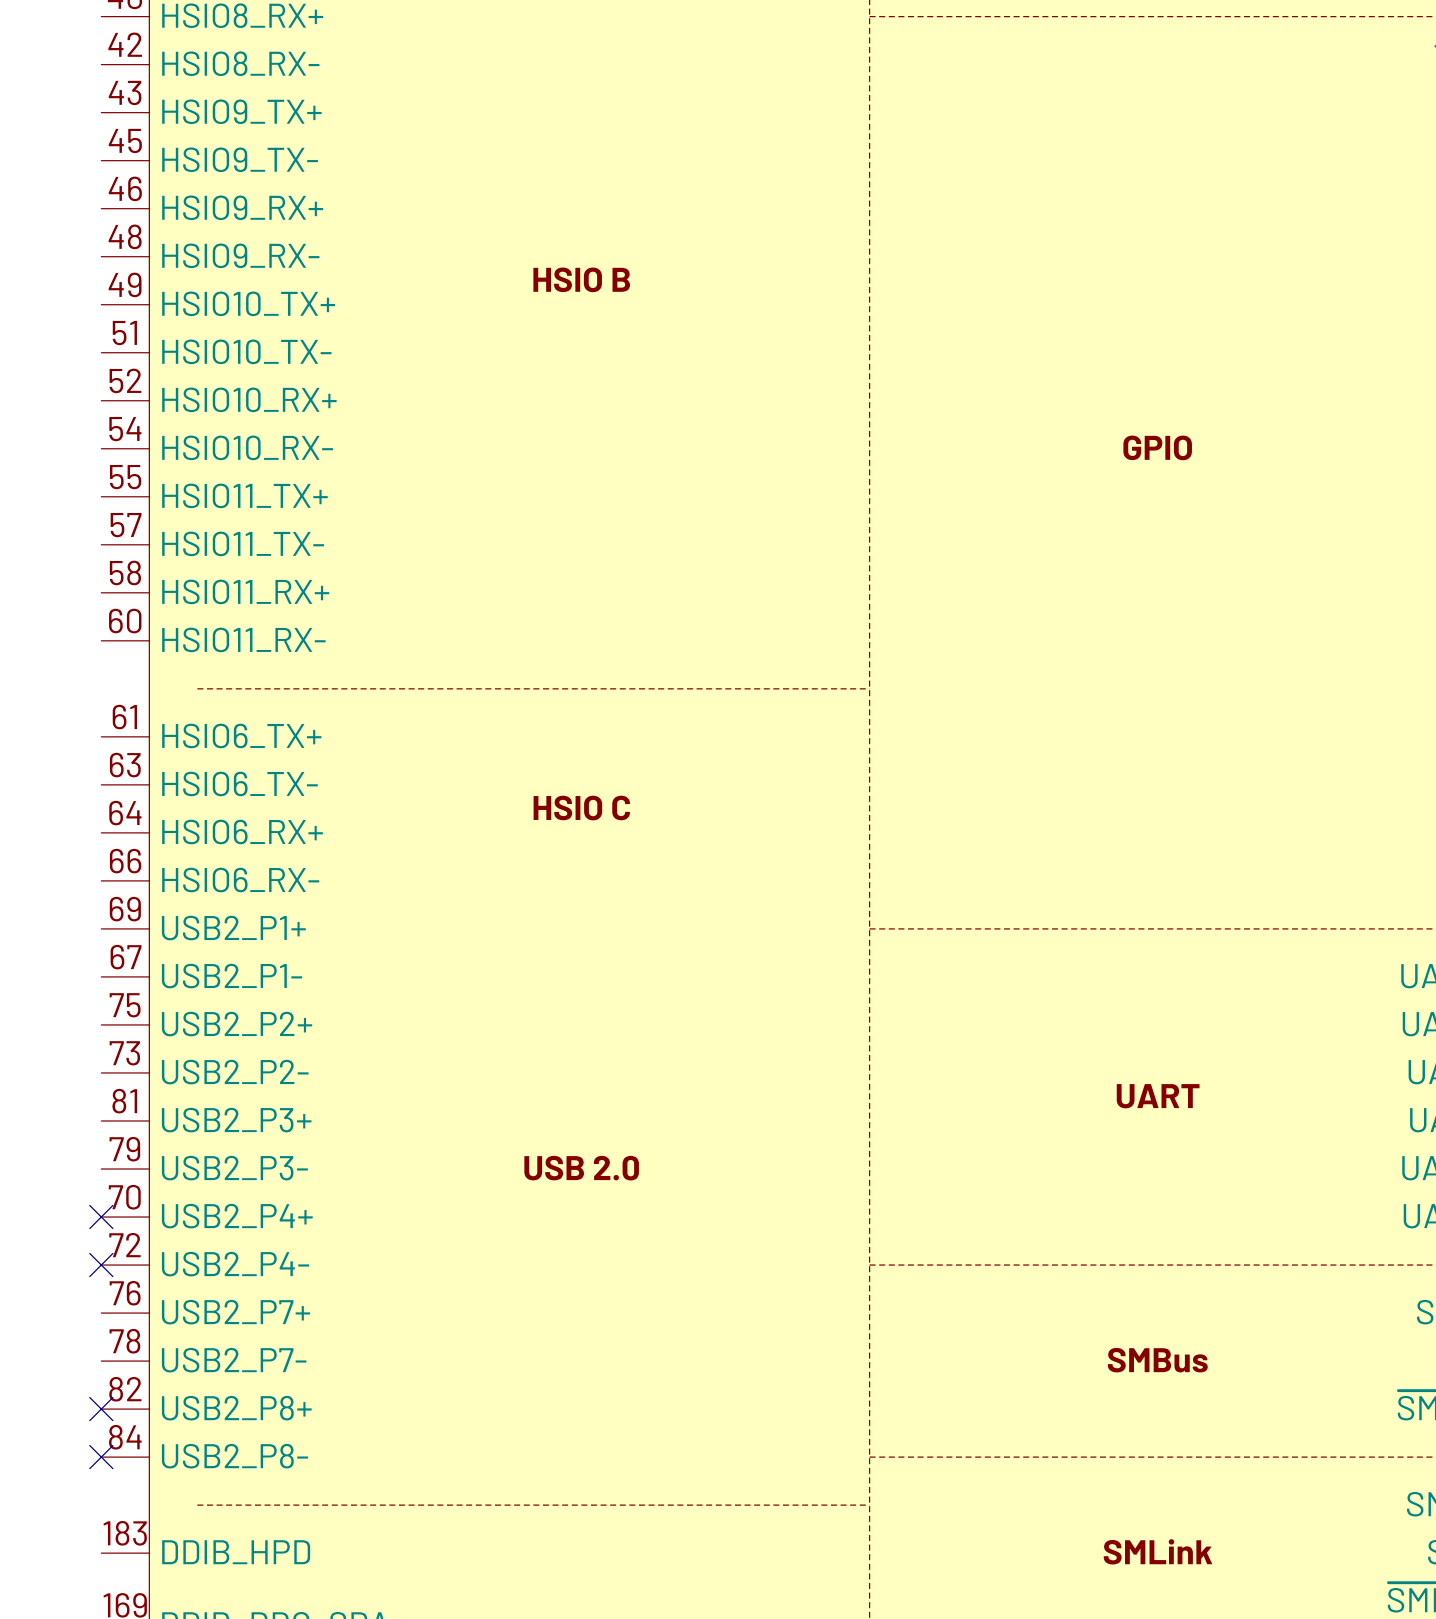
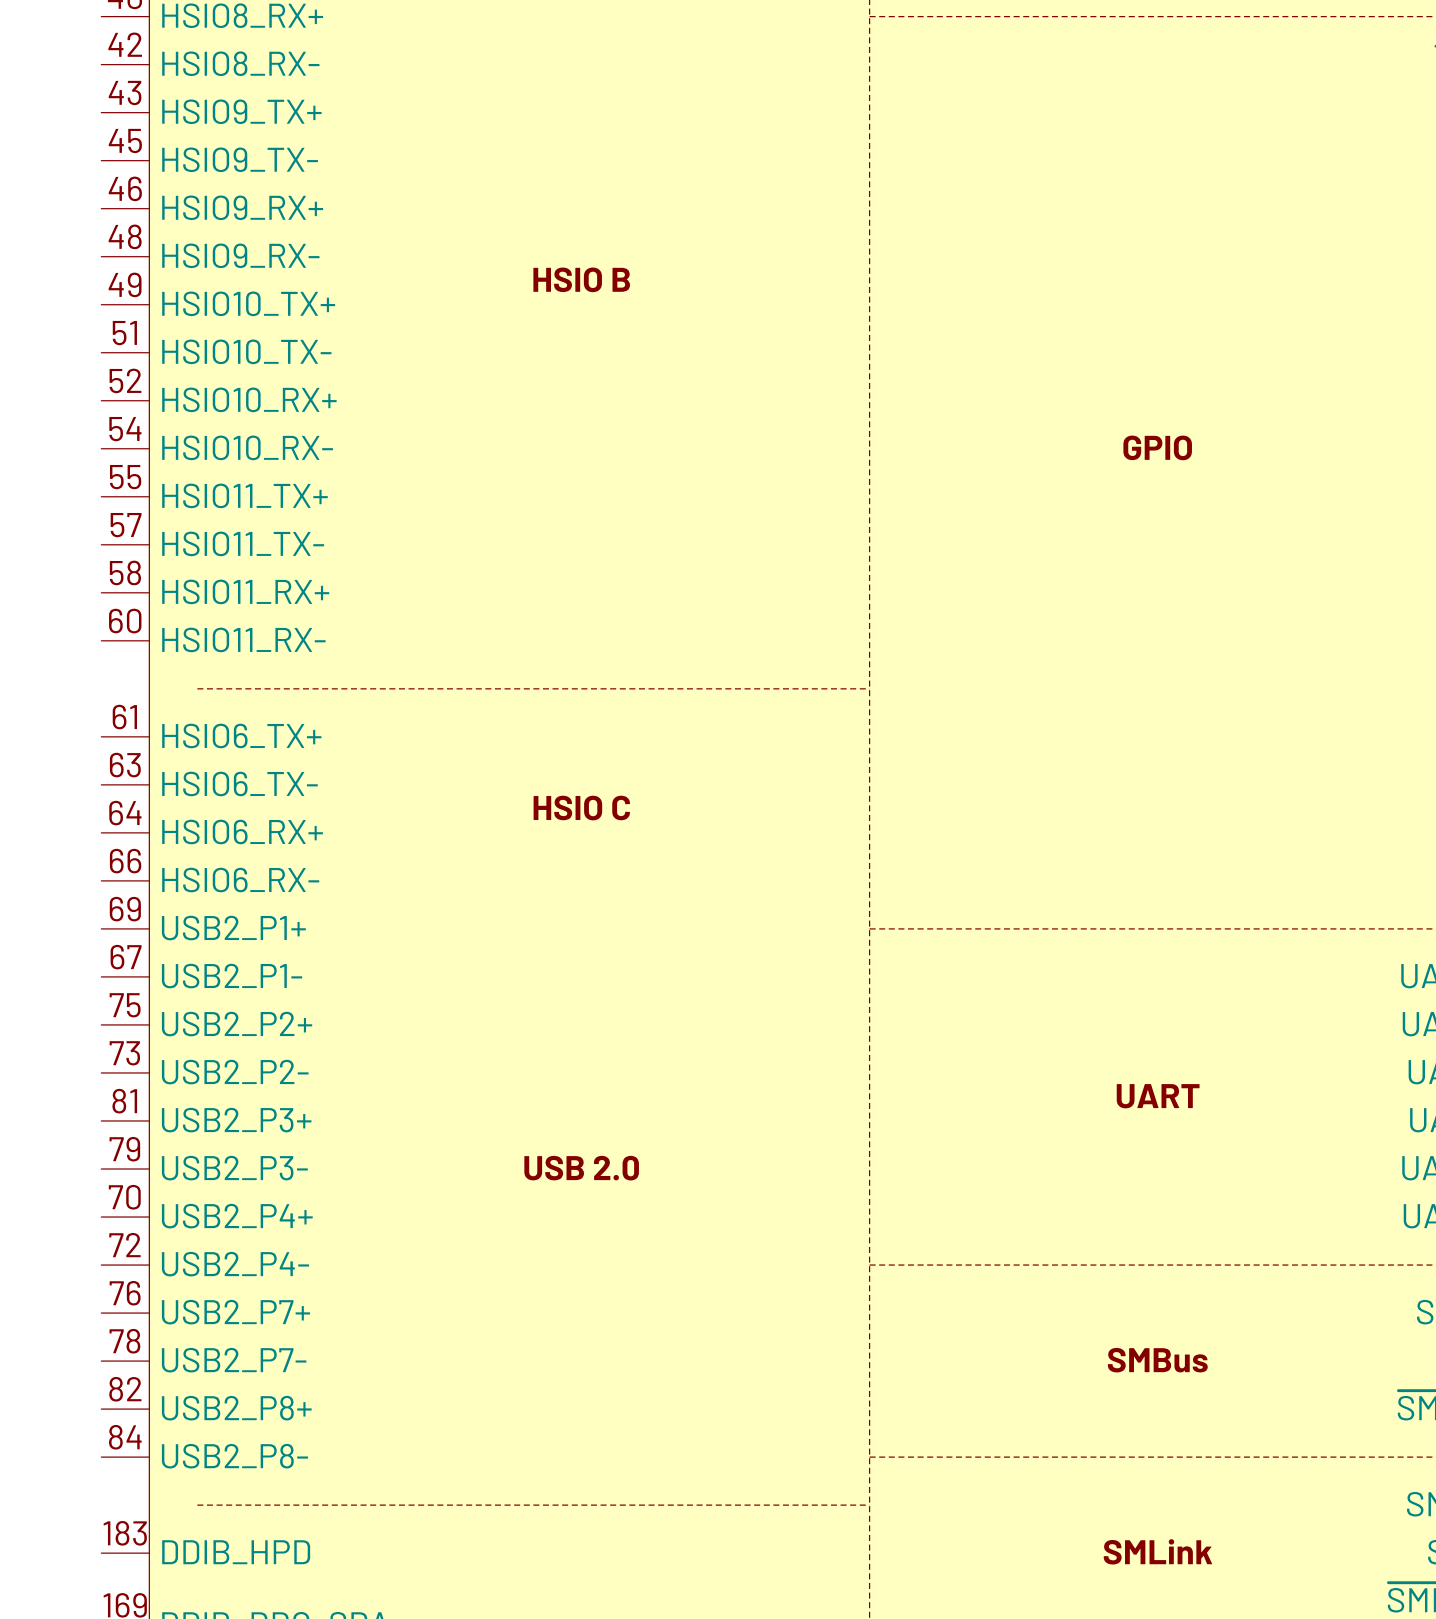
no-connect mark: (101, 1217) -> none
no-connect mark: (101, 1265) -> none
no-connect mark: (101, 1409) -> none
no-connect mark: (101, 1457) -> none

